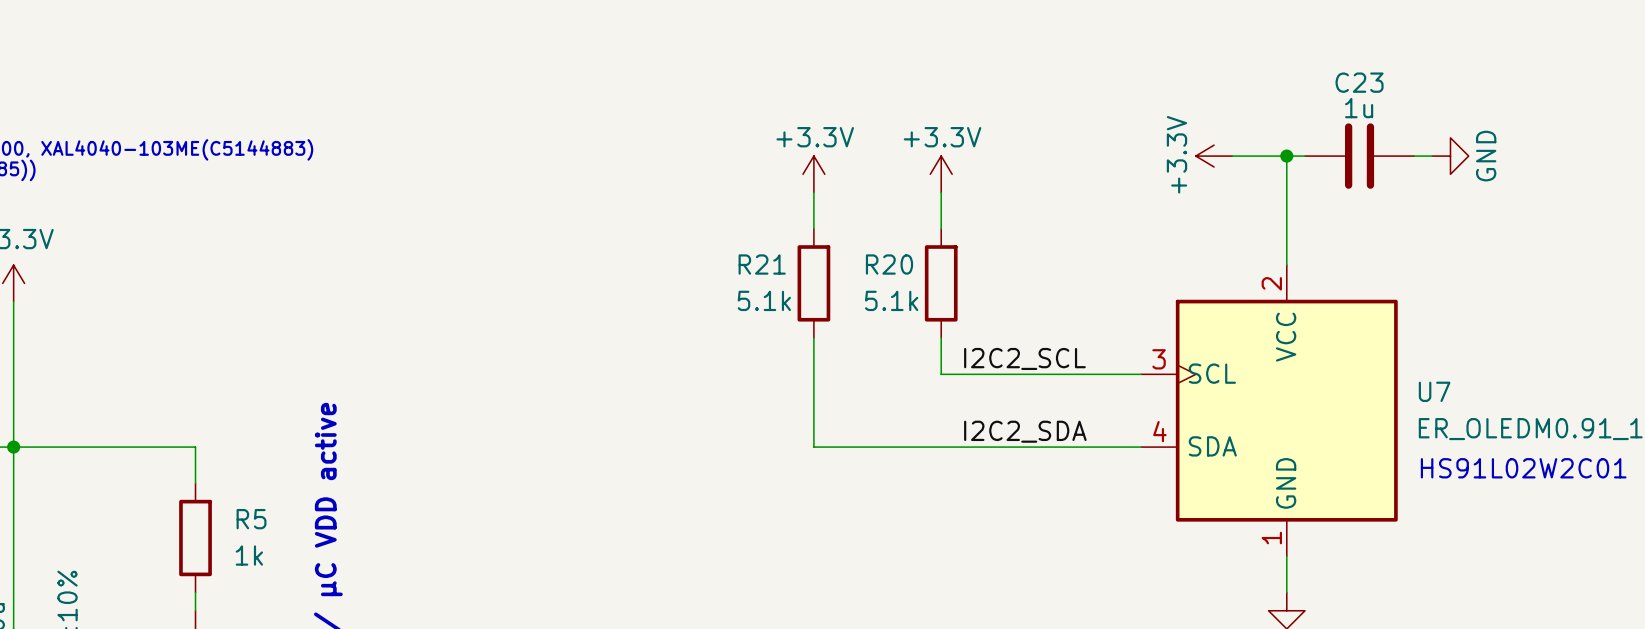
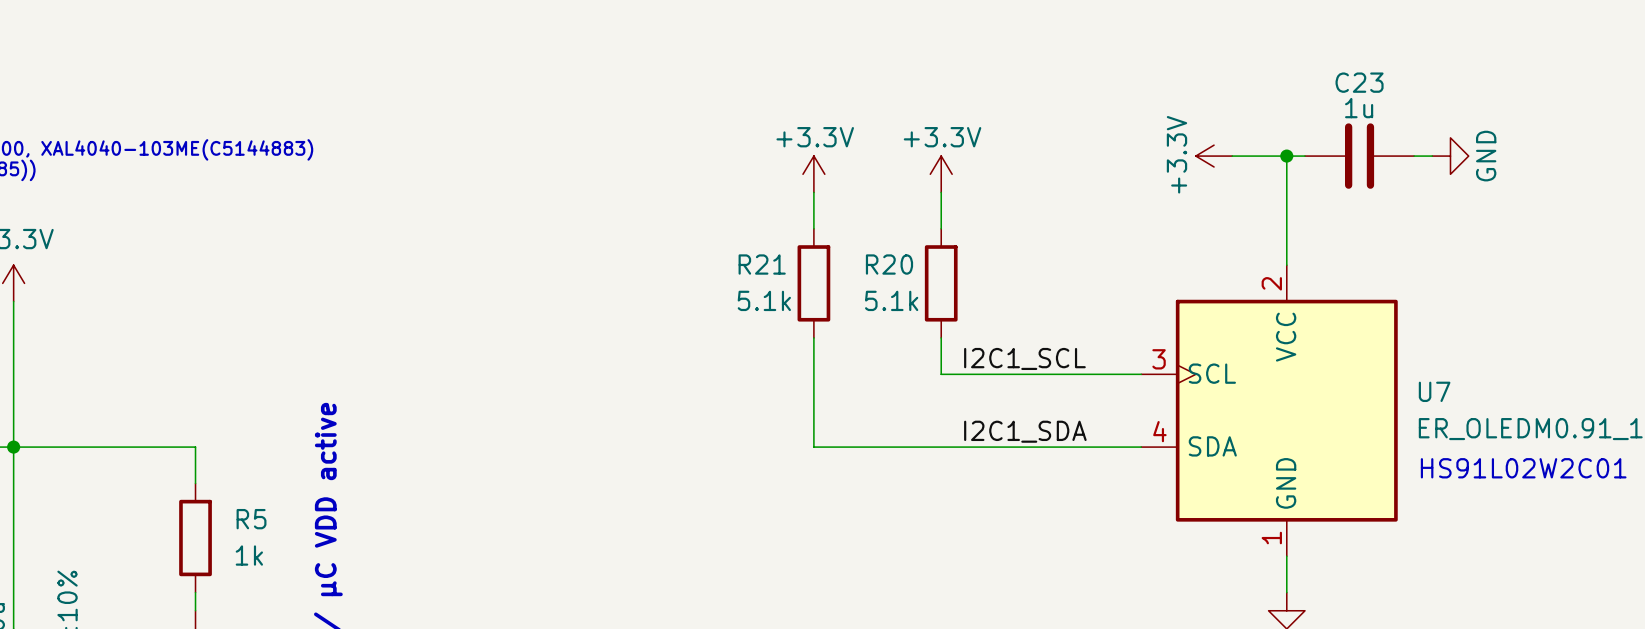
label: I2C2_SCL (1024, 358) -> I2C1_SCL (1024, 358)
label: I2C2_SDA (1025, 431) -> I2C1_SDA (1025, 431)

